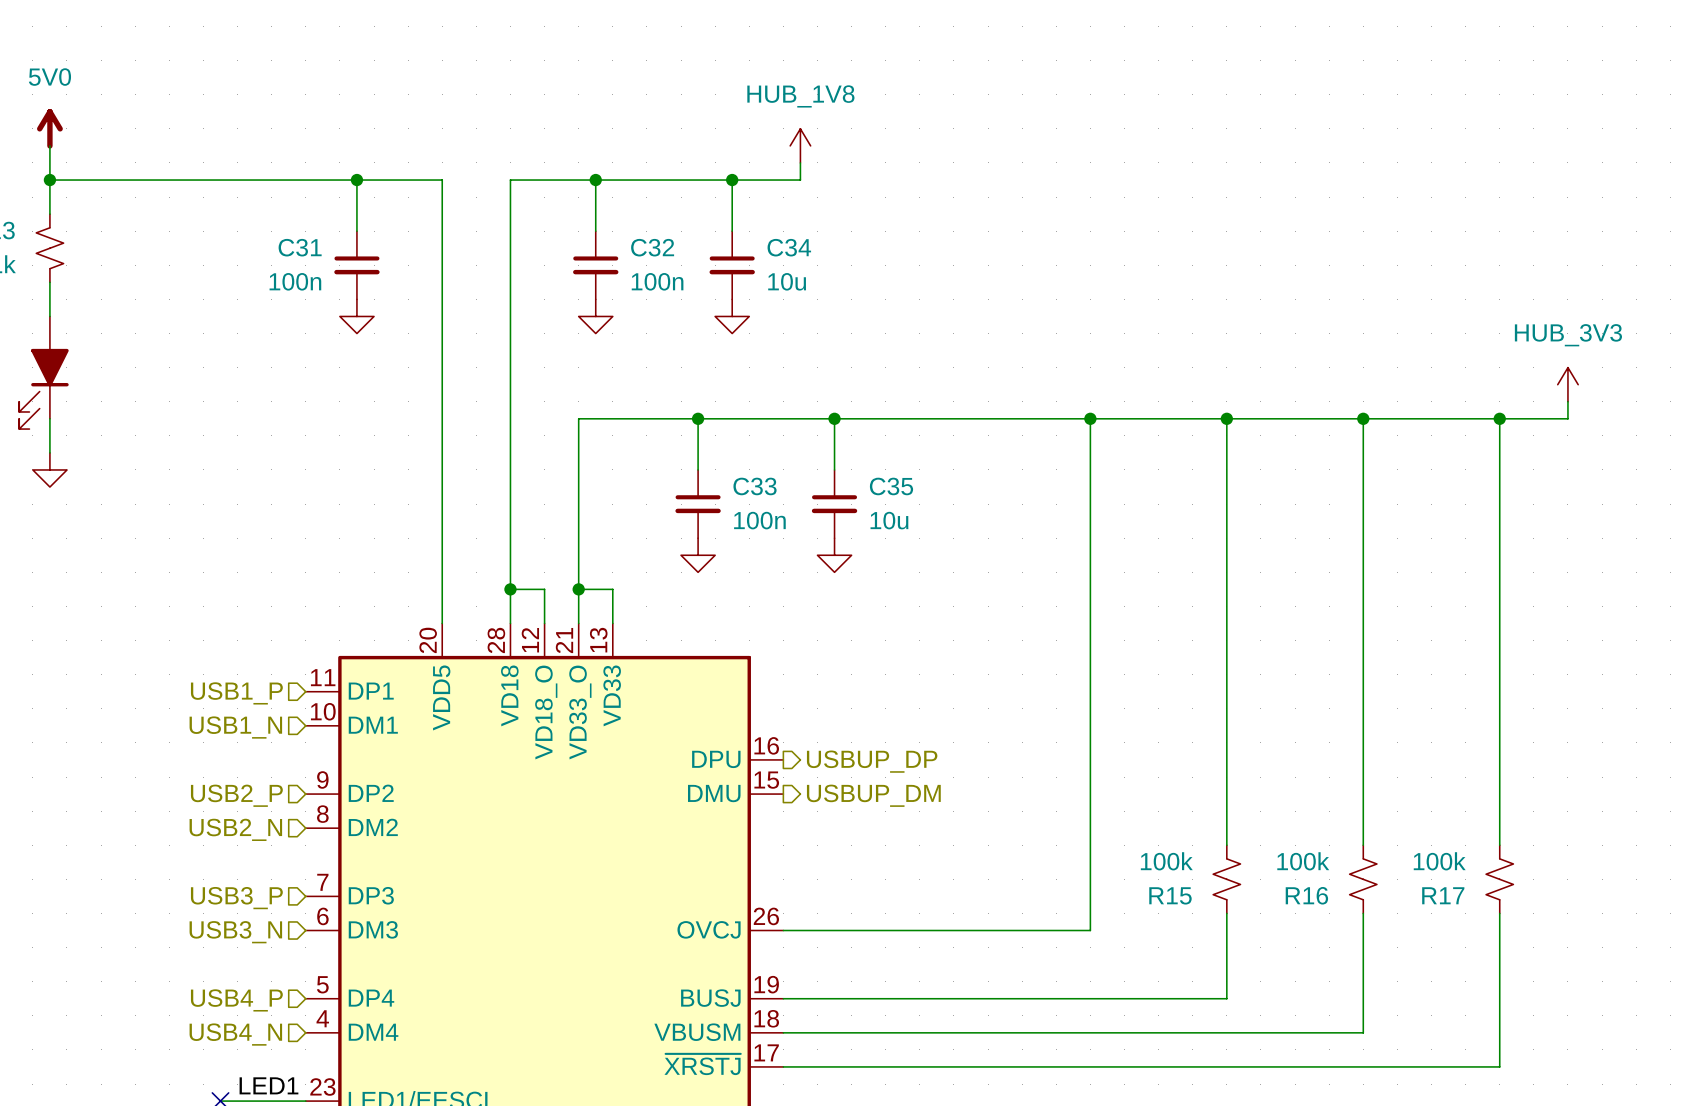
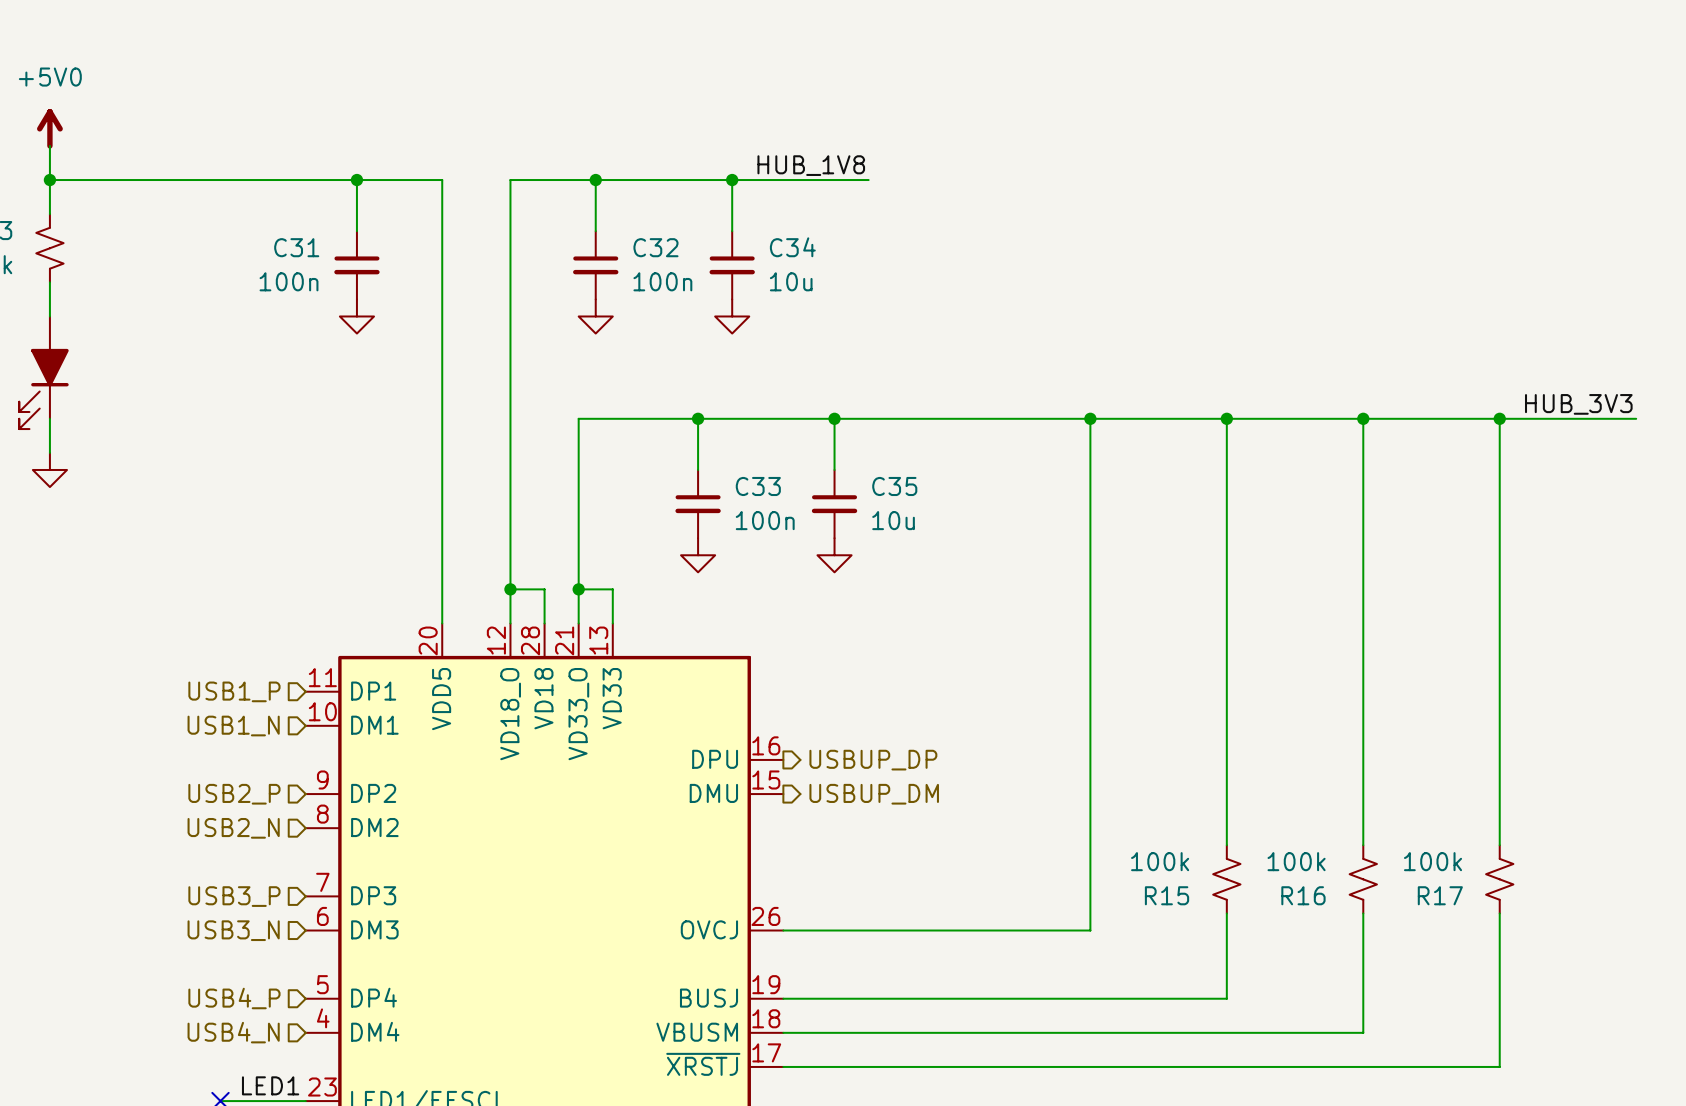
power symbol: 5V0 (49, 128) -> +5V0 (49, 128)
power symbol: HUB_1V8 (800, 145) -> none
wire: (800, 162) (800, 180) -> (868, 180) (800, 180)
label: none -> HUB_1V8 (811, 165)
power symbol: HUB_3V3 (1567, 384) -> none
wire: (1567, 401) (1567, 418) -> (1636, 418) (1567, 418)
label: none -> HUB_3V3 (1578, 404)
part pin number: 28 (496, 640) -> 12 (496, 640)
part pin number: 12 (530, 640) -> 28 (530, 640)
part pin name: VD18 (509, 695) -> VD18_O (510, 714)
part pin name: VD18_O (546, 712) -> VD18 (543, 698)

